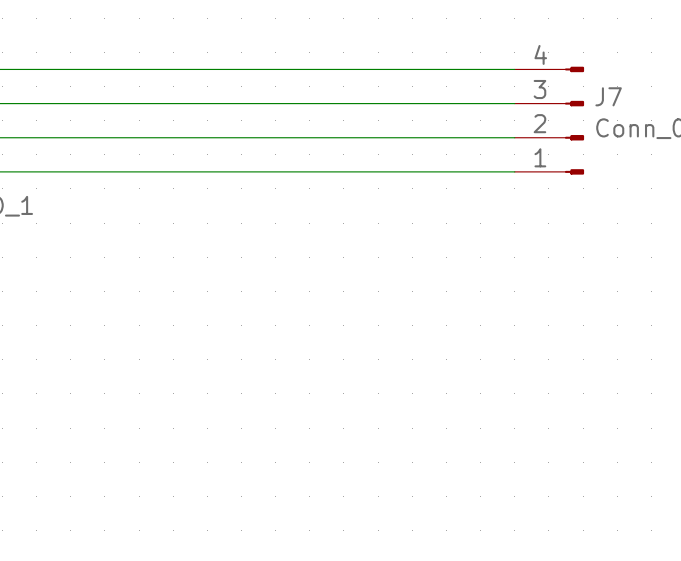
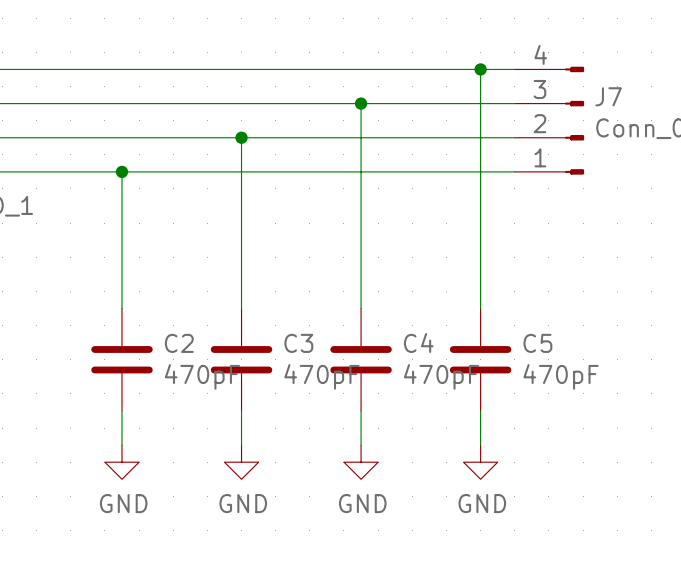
wire: none -> (480, 69) (480, 308)
junction: none -> (480, 69)
wire: none -> (361, 103) (361, 308)
junction: none -> (361, 103)
wire: none -> (241, 137) (241, 308)
junction: none -> (241, 137)
wire: none -> (121, 171) (121, 308)
junction: none -> (121, 171)
C2: none -> 470pF (121, 359)
C3: none -> 470pF (241, 359)
C4: none -> 470pF (361, 359)
C5: none -> 470pF (480, 359)
wire: none -> (121, 410) (121, 445)
wire: none -> (241, 410) (241, 445)
wire: none -> (361, 410) (361, 445)
wire: none -> (480, 410) (480, 445)
power symbol: none -> GND (121, 462)
power symbol: none -> GND (241, 462)
power symbol: none -> GND (361, 462)
power symbol: none -> GND (480, 462)

